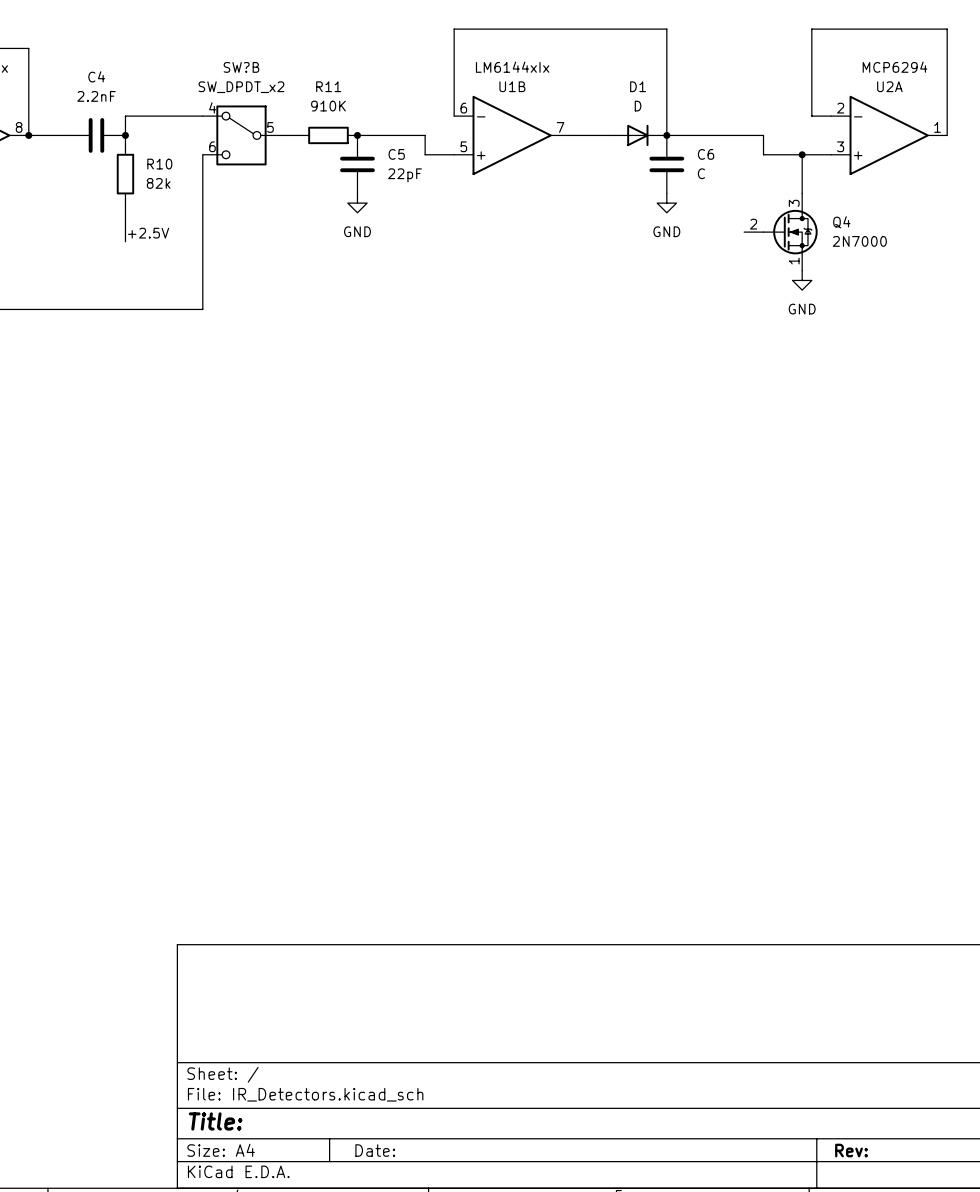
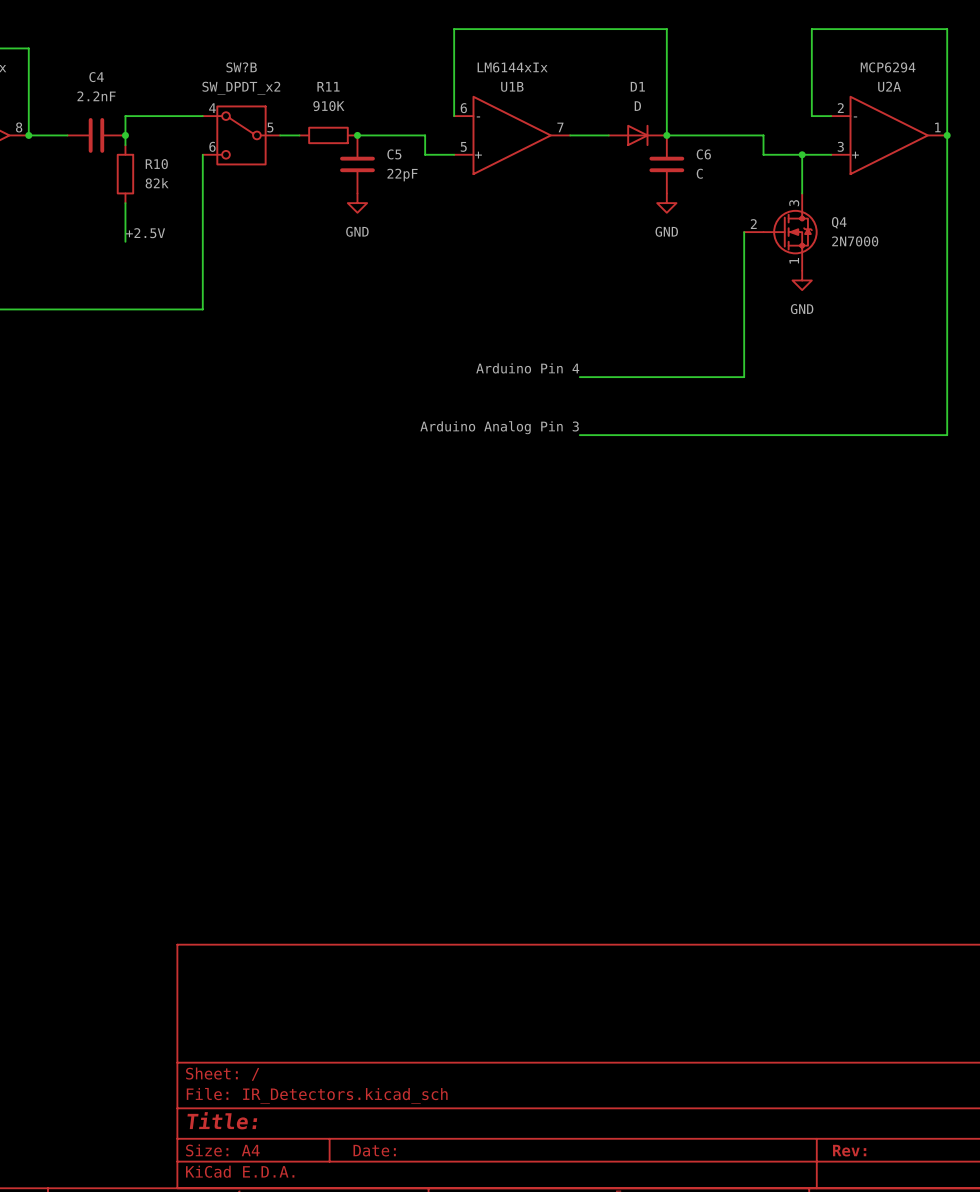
wire: none -> (947, 135) (947, 435) (579, 435)
junction: none -> (947, 135)
wire: none -> (744, 232) (744, 377) (579, 377)
label: none -> Arduino Pin 4 (527, 368)
label: none -> Arduino Analog Pin 3 (499, 427)

